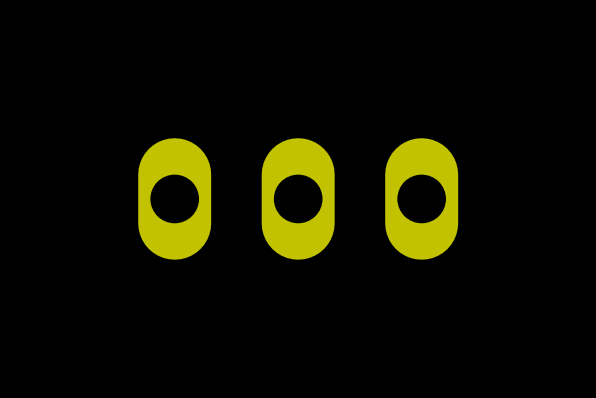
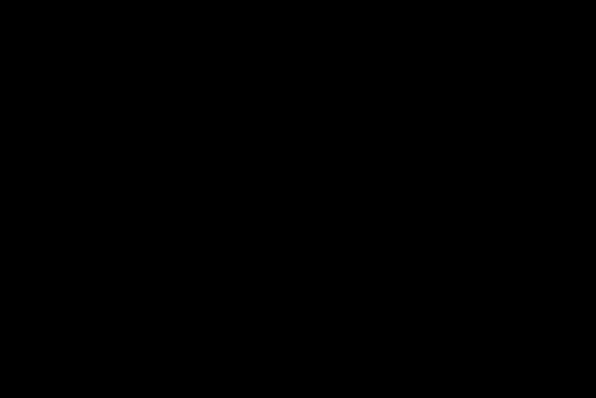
part: (298, 198) -> none

